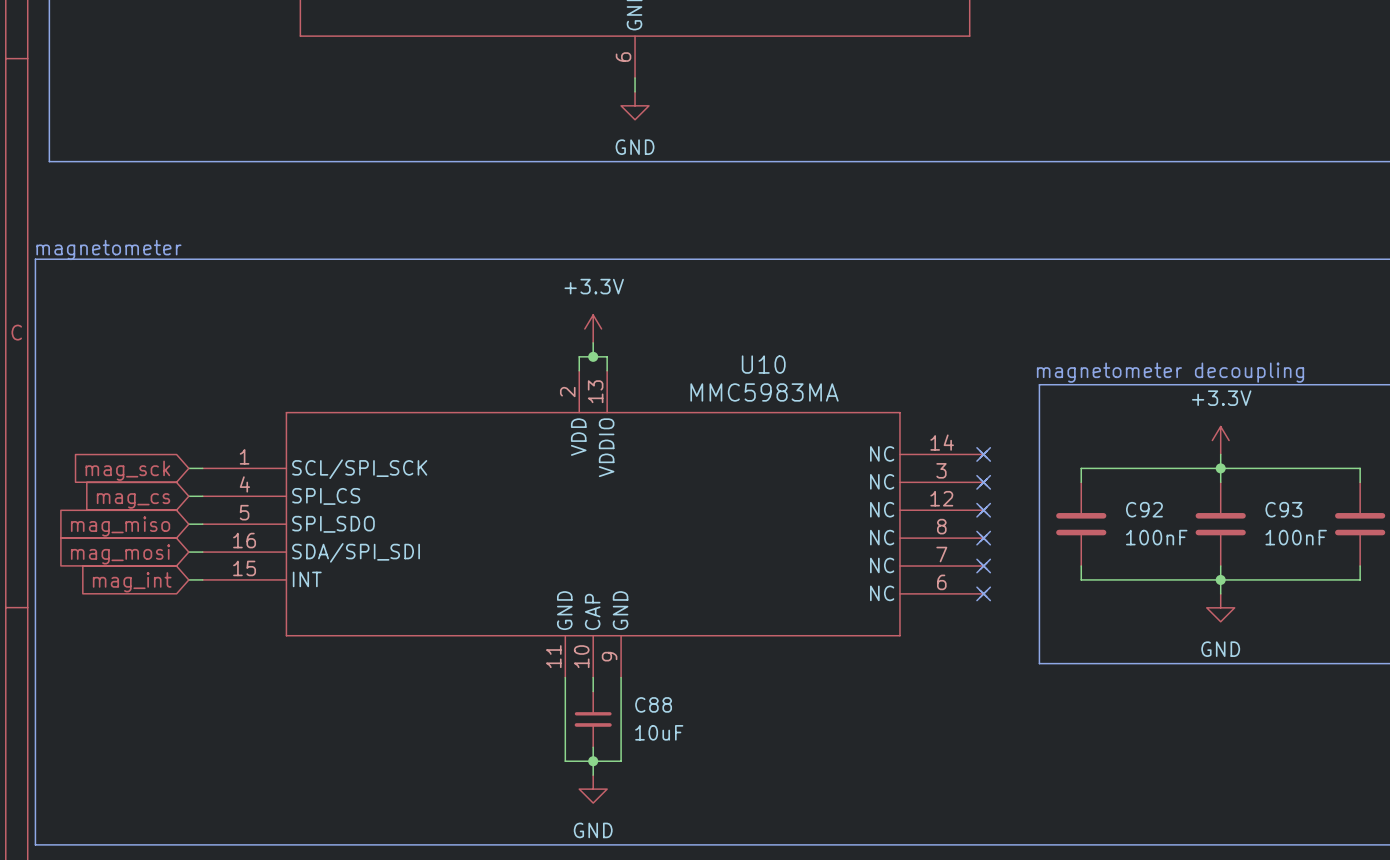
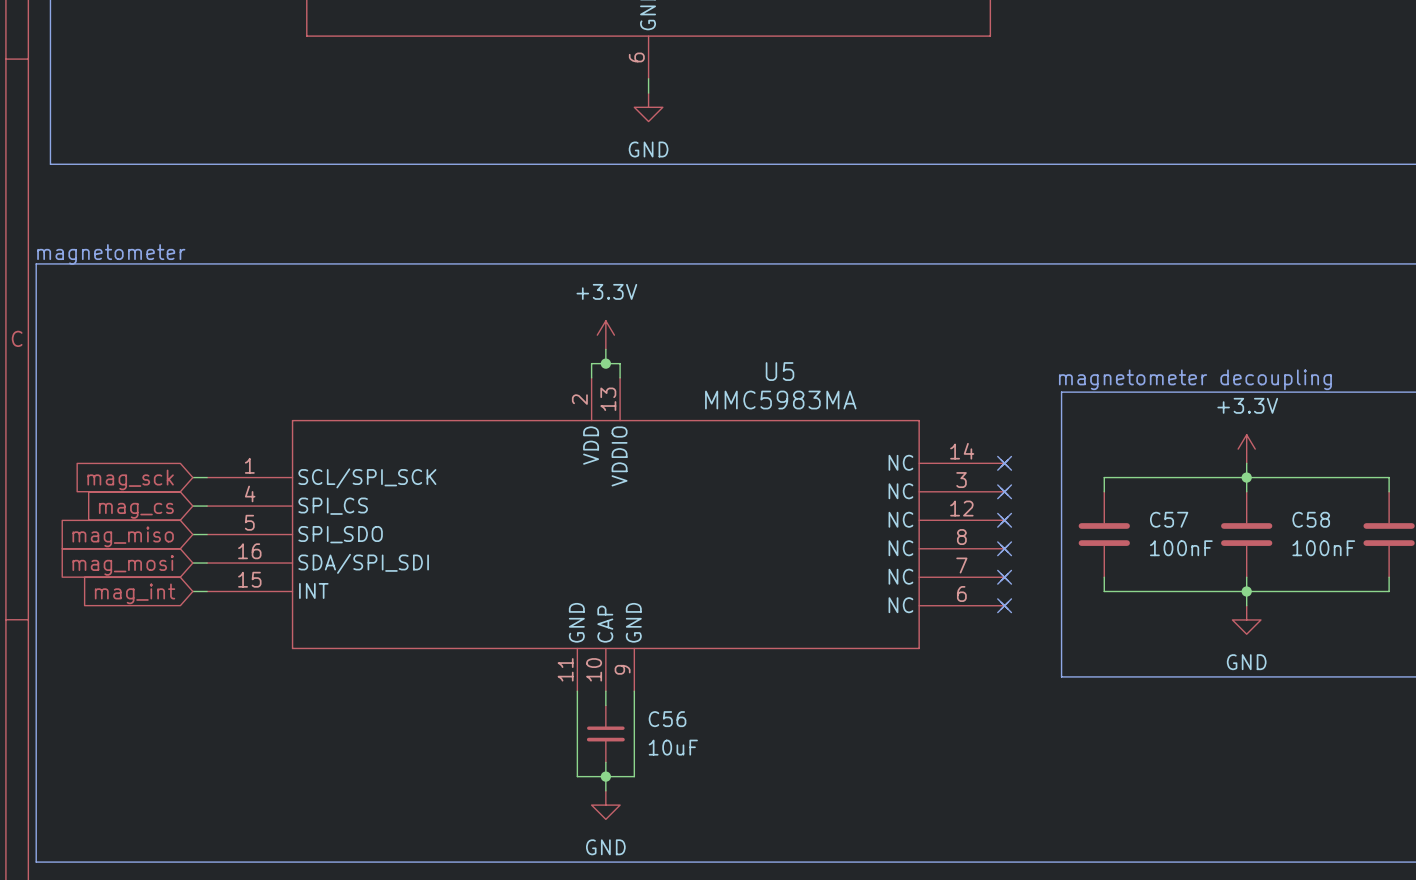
U10 name: U10 (763, 364) -> U5 (779, 371)
C92 name: C92 (1144, 509) -> C57 (1169, 519)
C93 name: C93 (1283, 509) -> C58 (1311, 519)
C88 name: C88 (653, 704) -> C56 (667, 719)

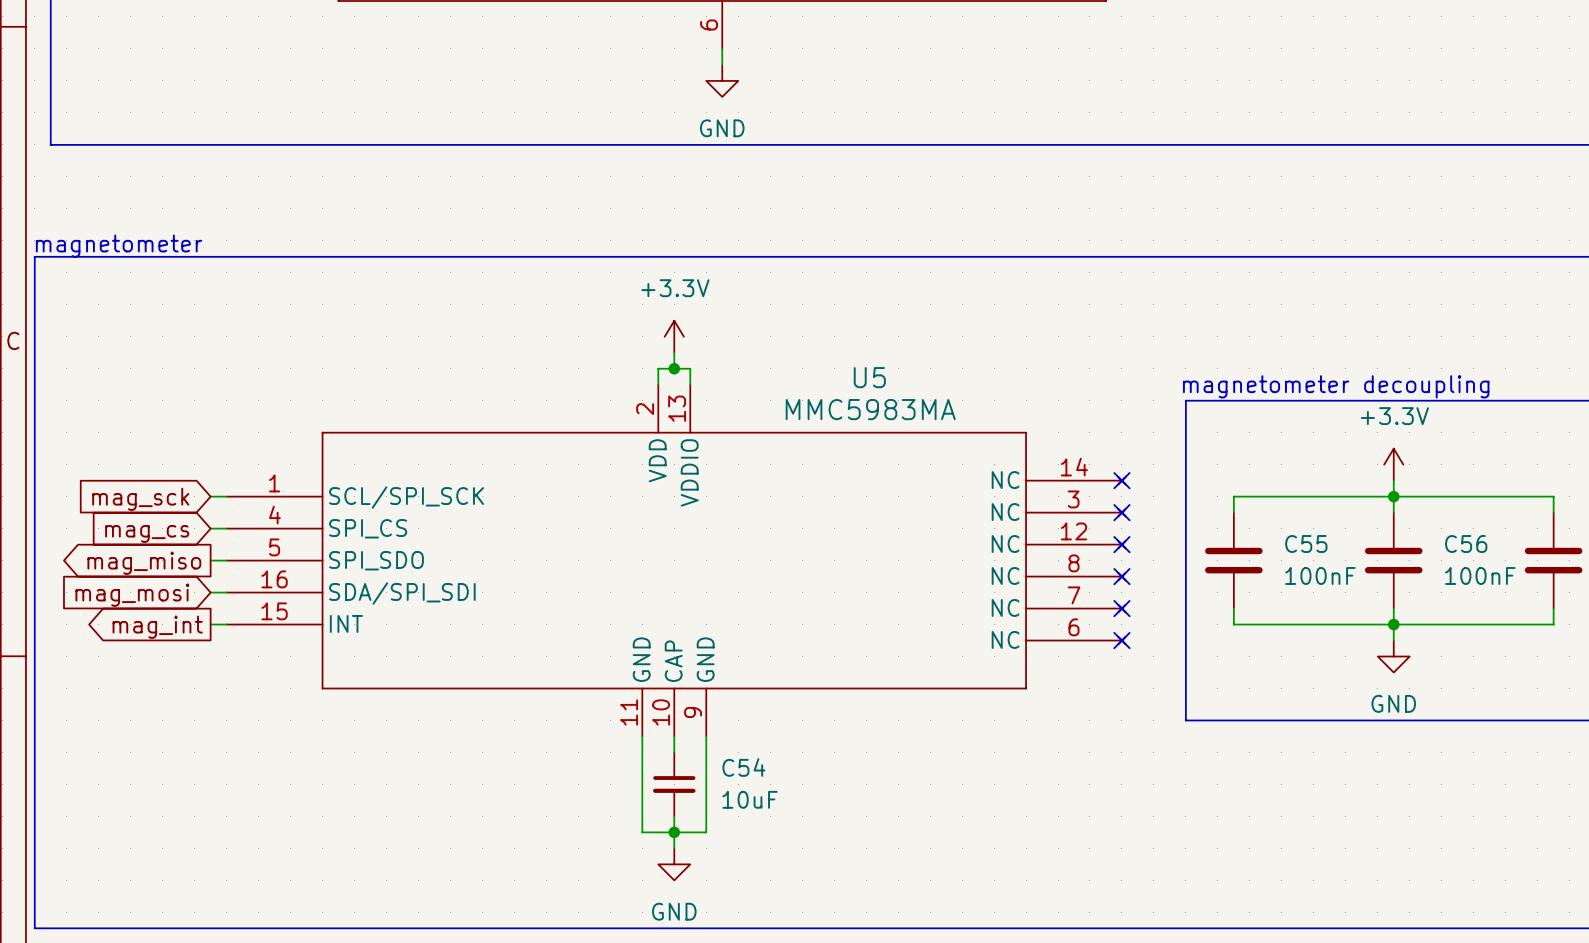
C57 name: C57 (1169, 519) -> C55 (1306, 544)
C58 name: C58 (1311, 519) -> C56 (1466, 544)
global label shape: input (123, 536) -> output (144, 563)
global label shape: input (135, 593) -> output (157, 627)
C56 name: C56 (667, 719) -> C54 (743, 767)

